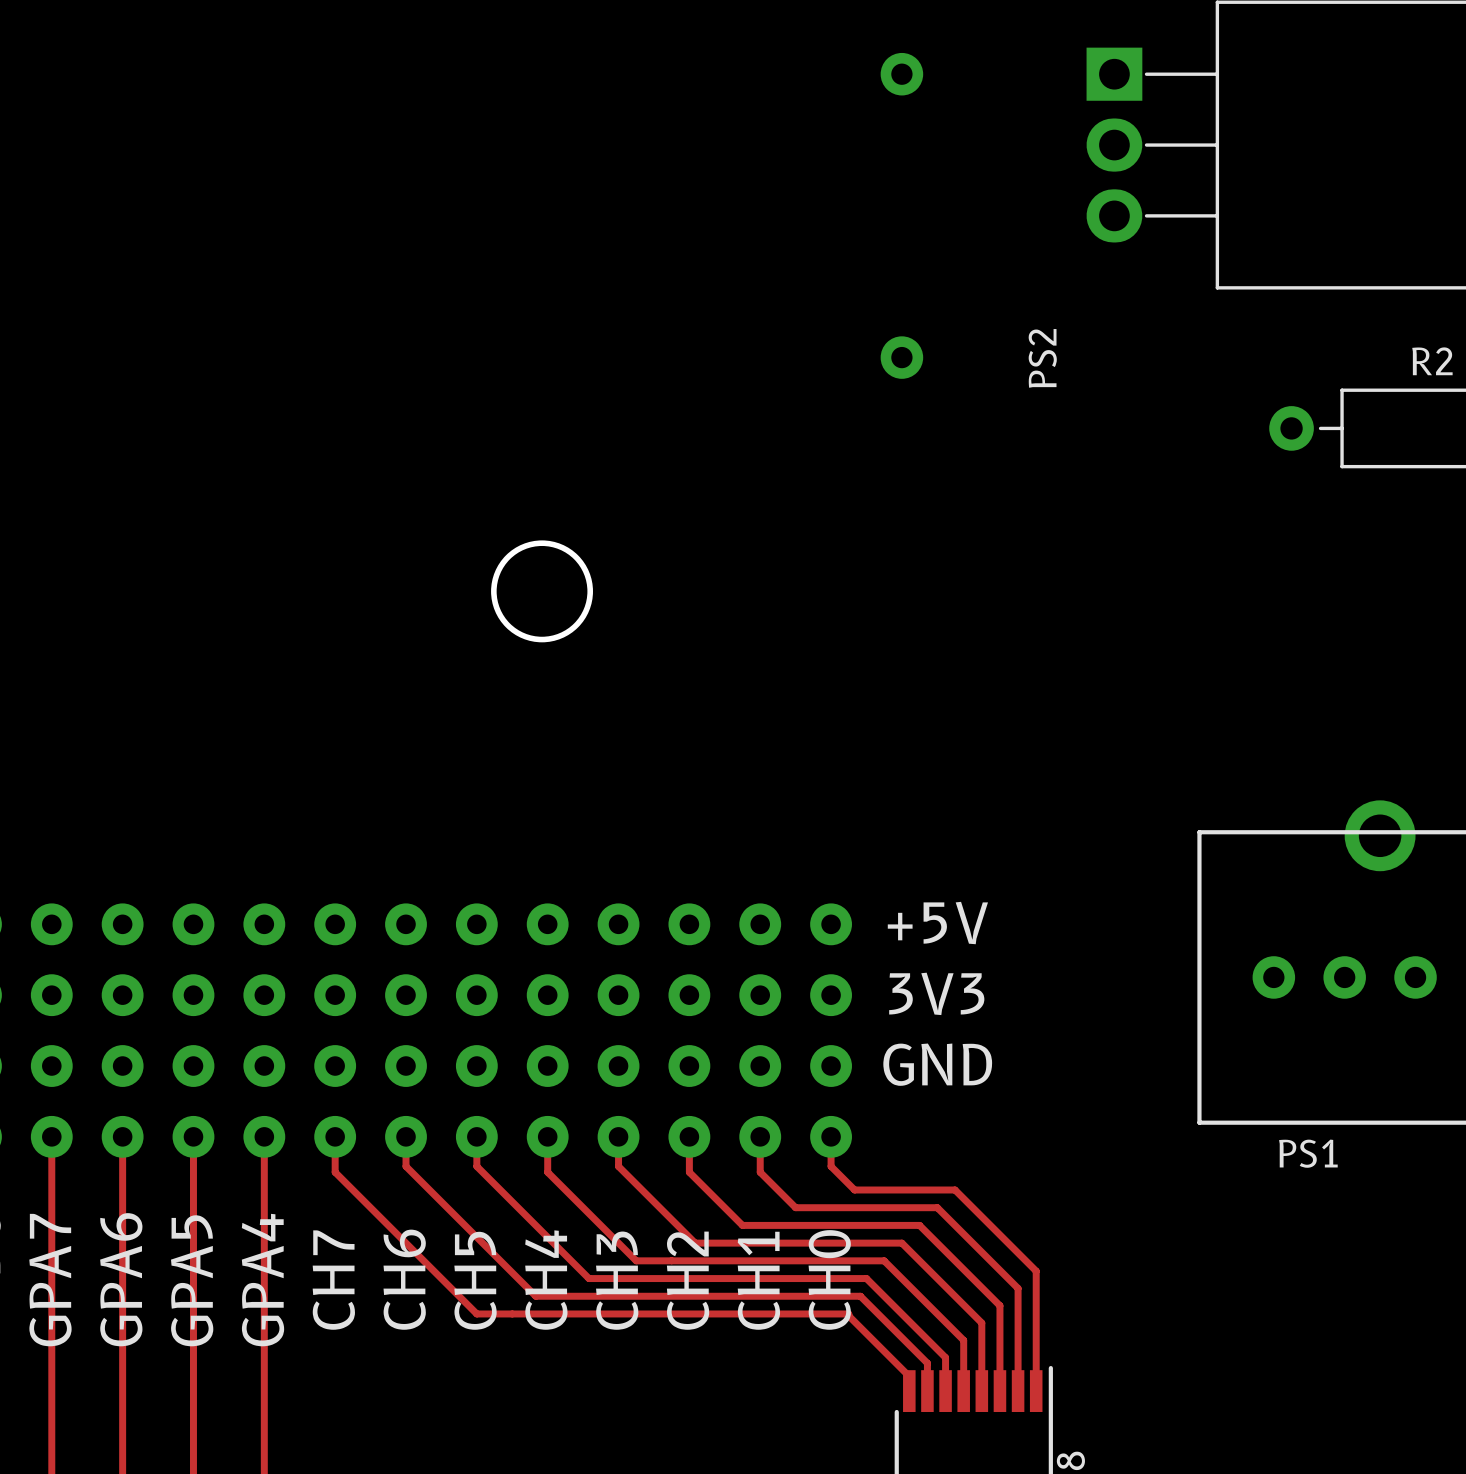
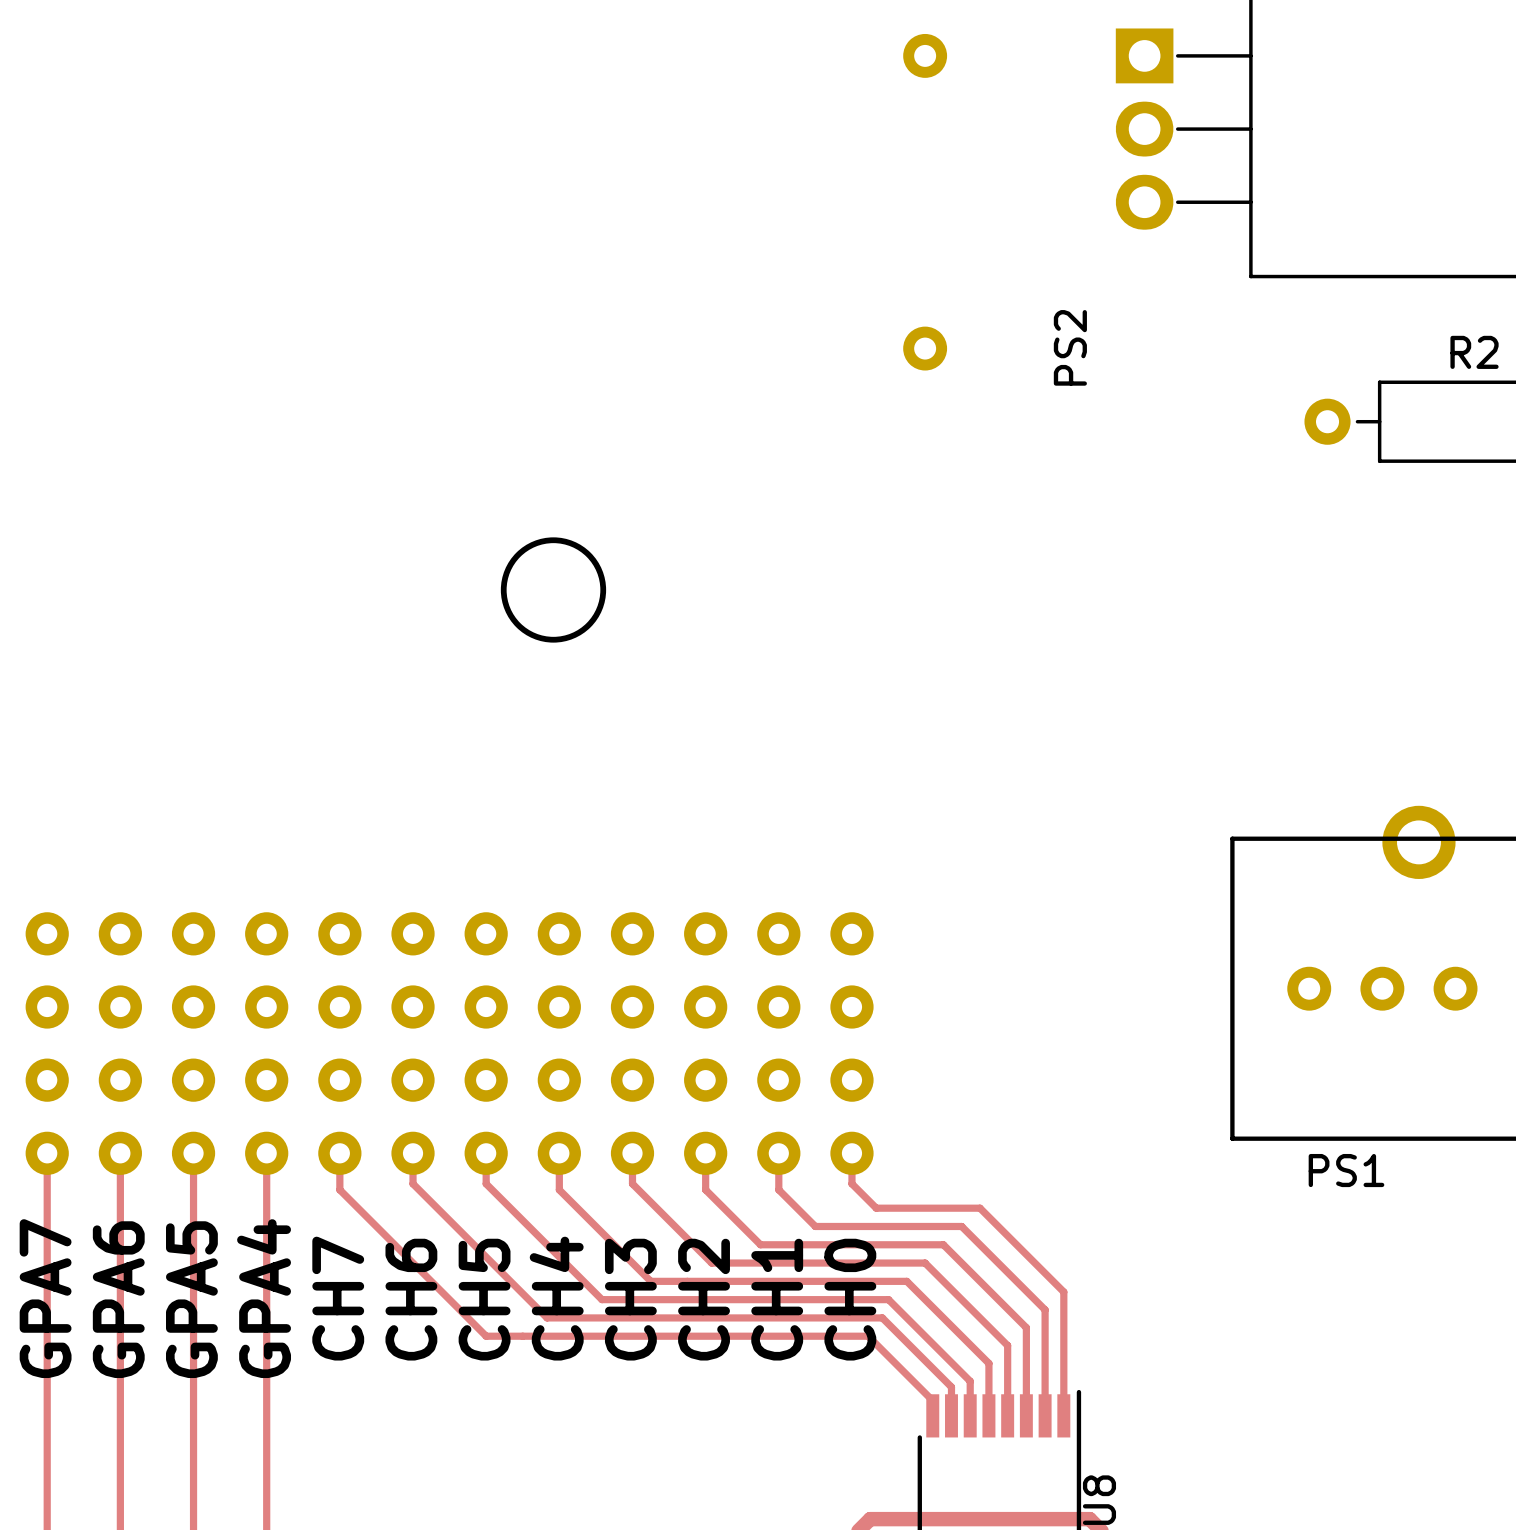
text: +5V (937, 923) -> none
text: 3V3 (936, 993) -> none
text: GND (937, 1064) -> none

